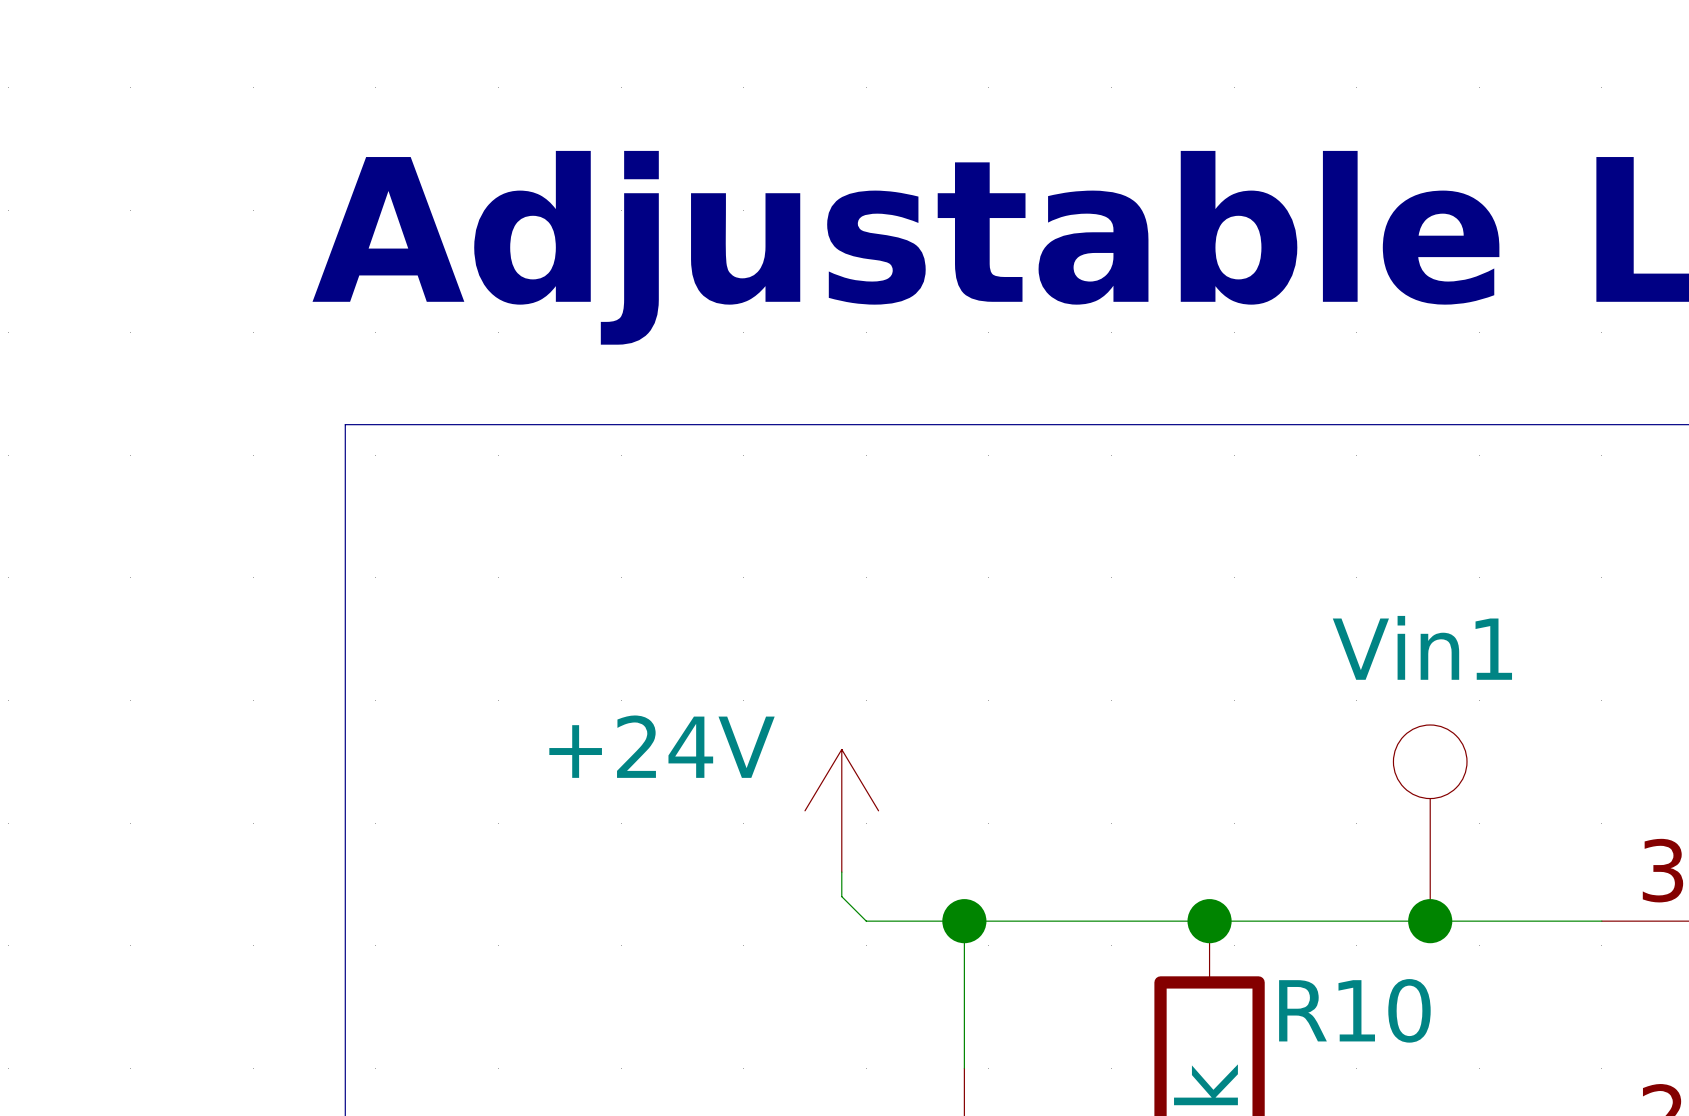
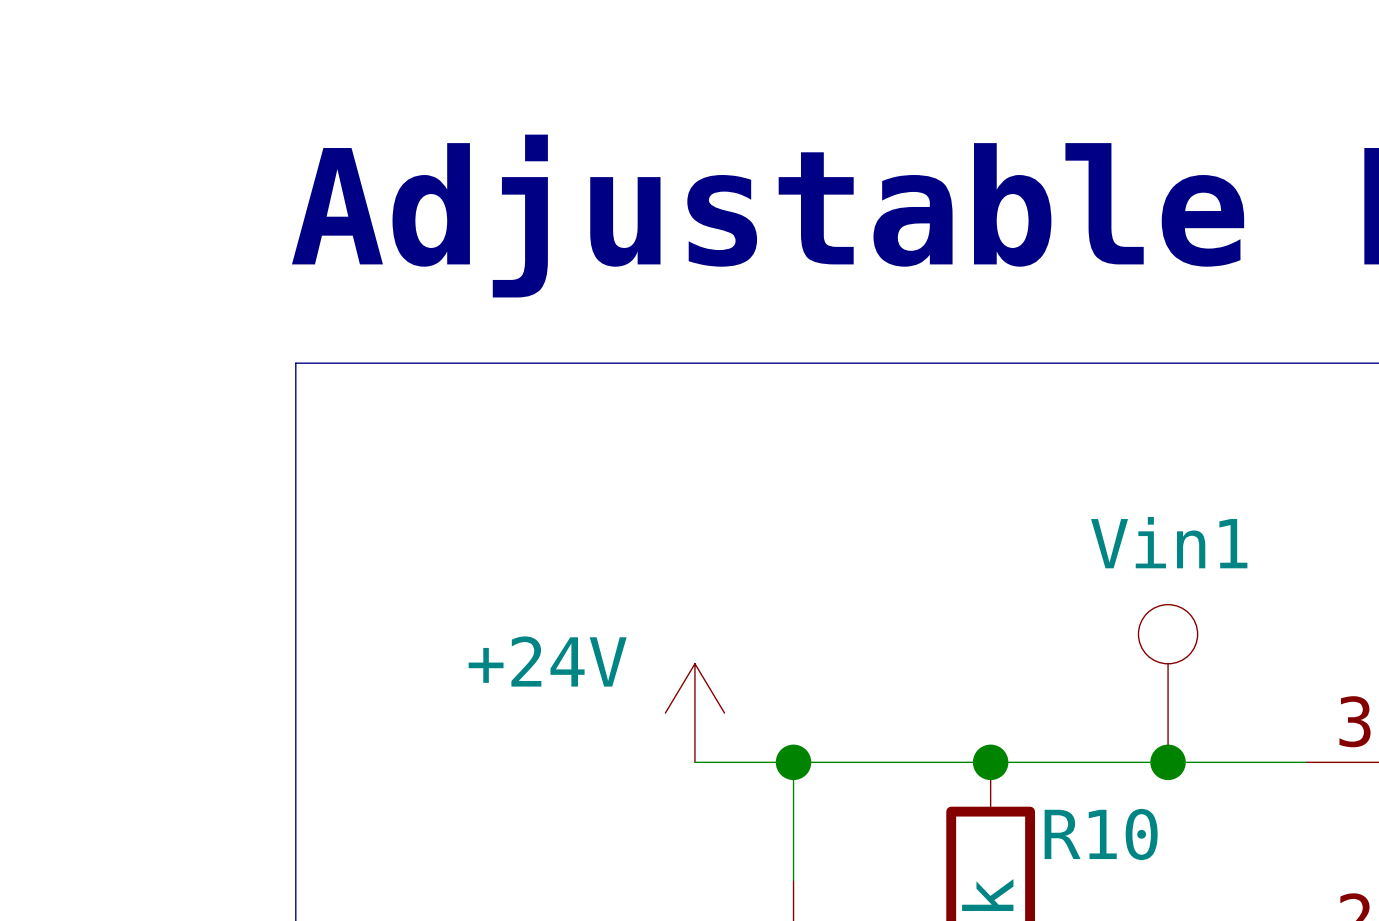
power symbol position: +24V (841, 810) -> +24V (694, 713)
wire: (841, 872) (841, 896) (866, 921) -> (694, 762) (714, 762)

